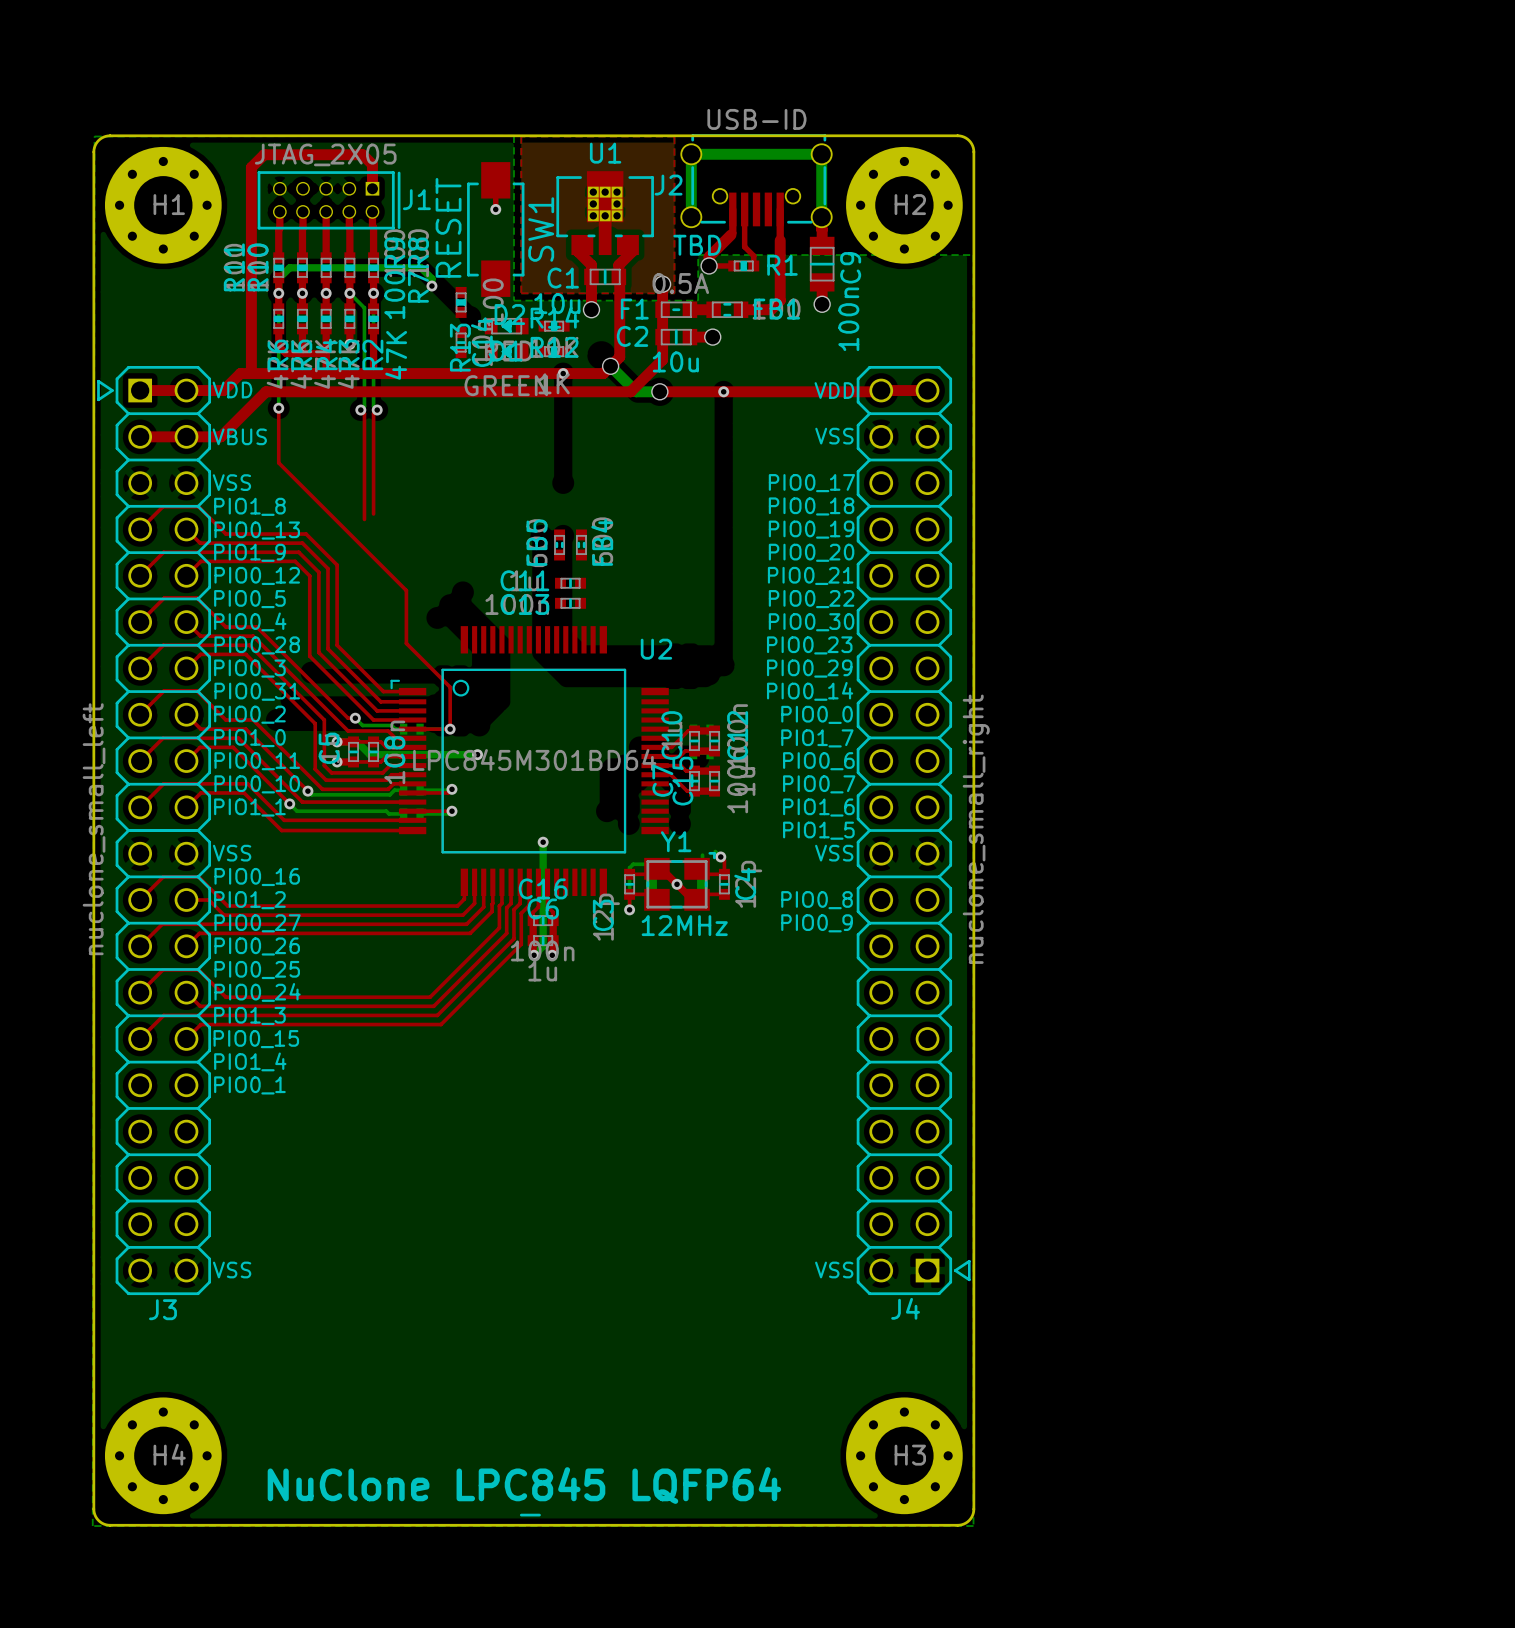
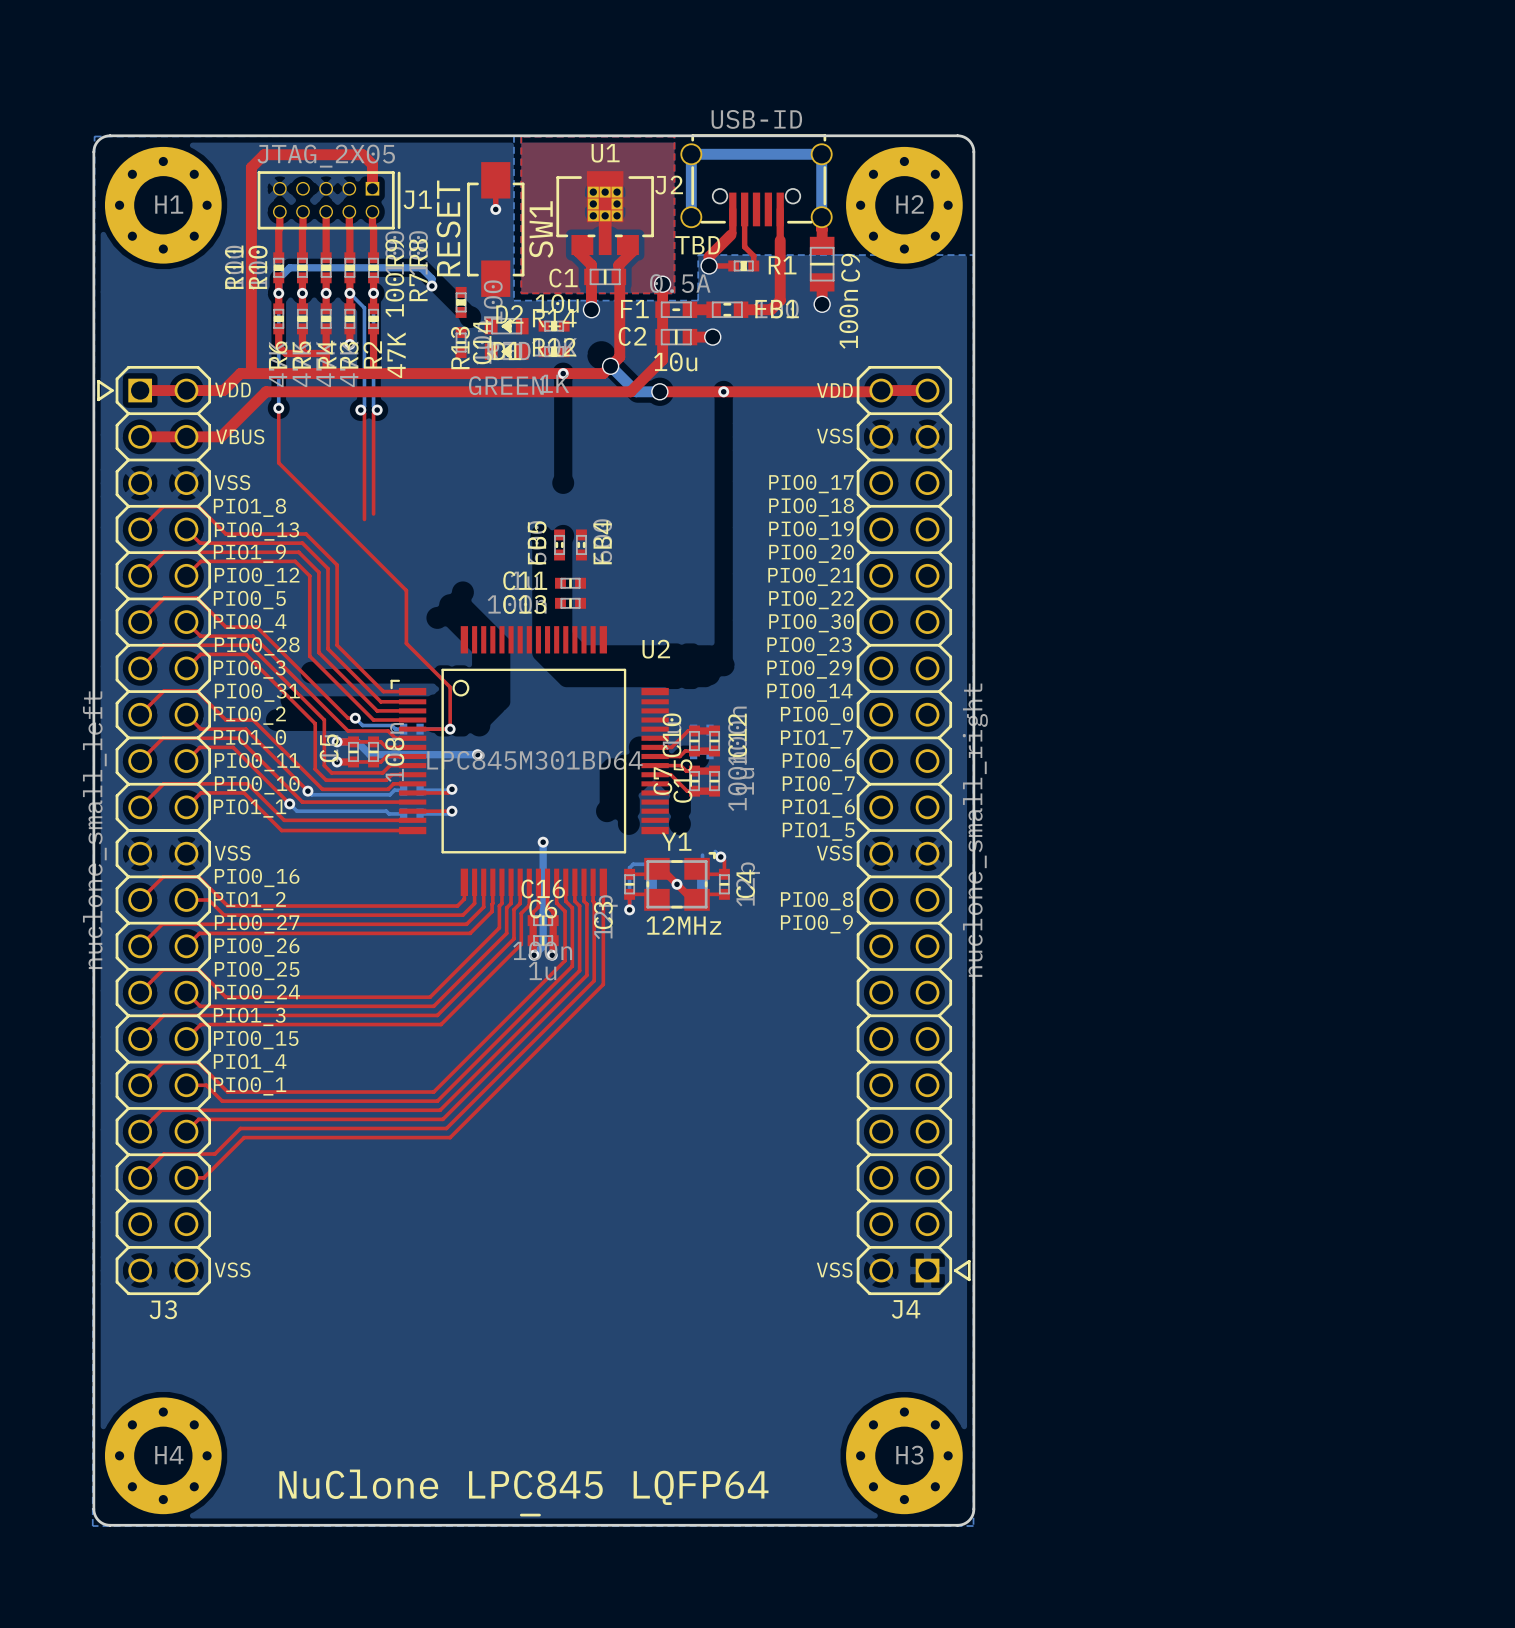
top track: none -> (556, 882) (556, 903) (565, 911) (565, 960) (433, 1092) (227, 1092) (198, 1062) (162, 1062) (140, 1085)
top track: none -> (565, 882) (565, 901) (572, 907) (572, 966) (437, 1101) (222, 1101) (206, 1085) (186, 1085)
top track: none -> (574, 882) (574, 901) (579, 906) (579, 970) (440, 1110) (161, 1110) (140, 1131)
top track: none -> (584, 882) (584, 901) (586, 904) (586, 975) (442, 1119) (198, 1119) (186, 1131)
top track: none -> (593, 882) (594, 980) (446, 1128) (240, 1128) (214, 1154) (163, 1154) (140, 1177)
top track: none -> (603, 882) (603, 984) (450, 1137) (244, 1137) (203, 1177) (186, 1177)

